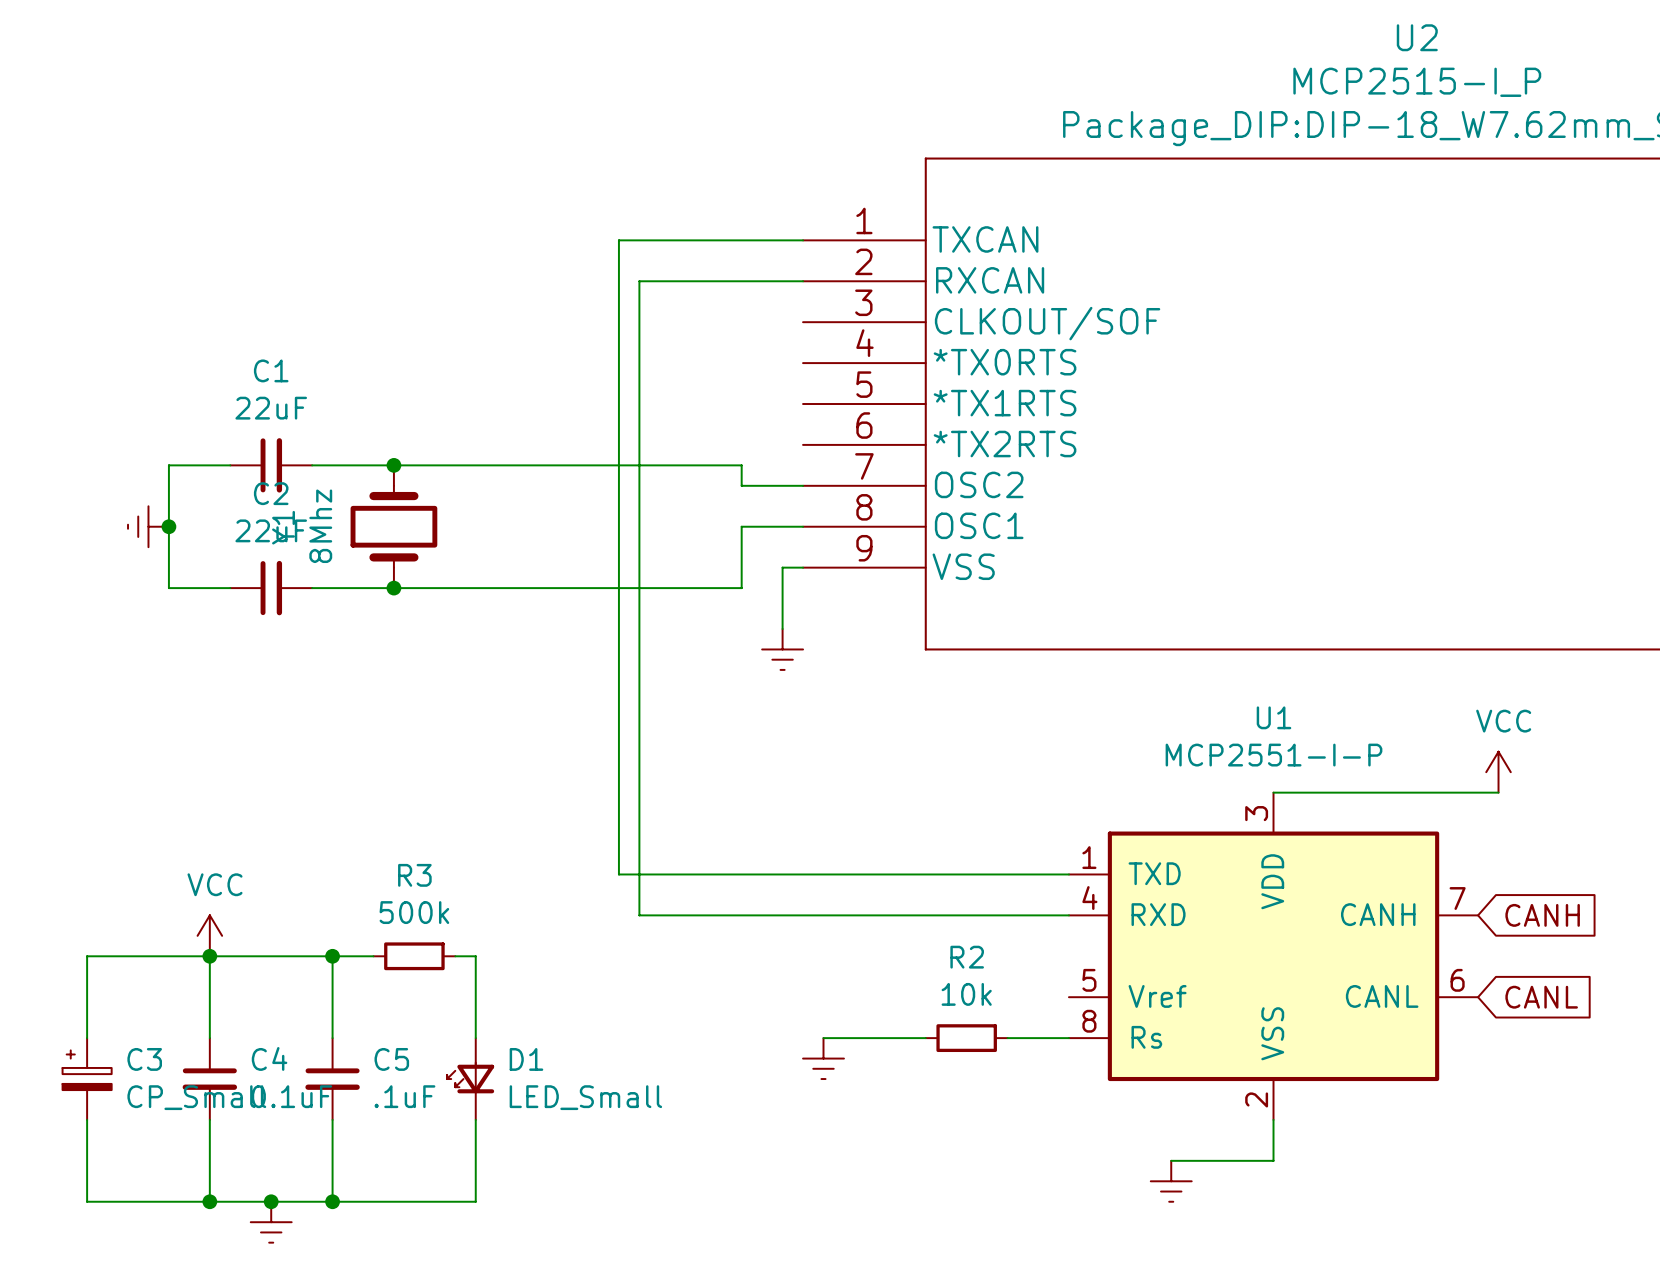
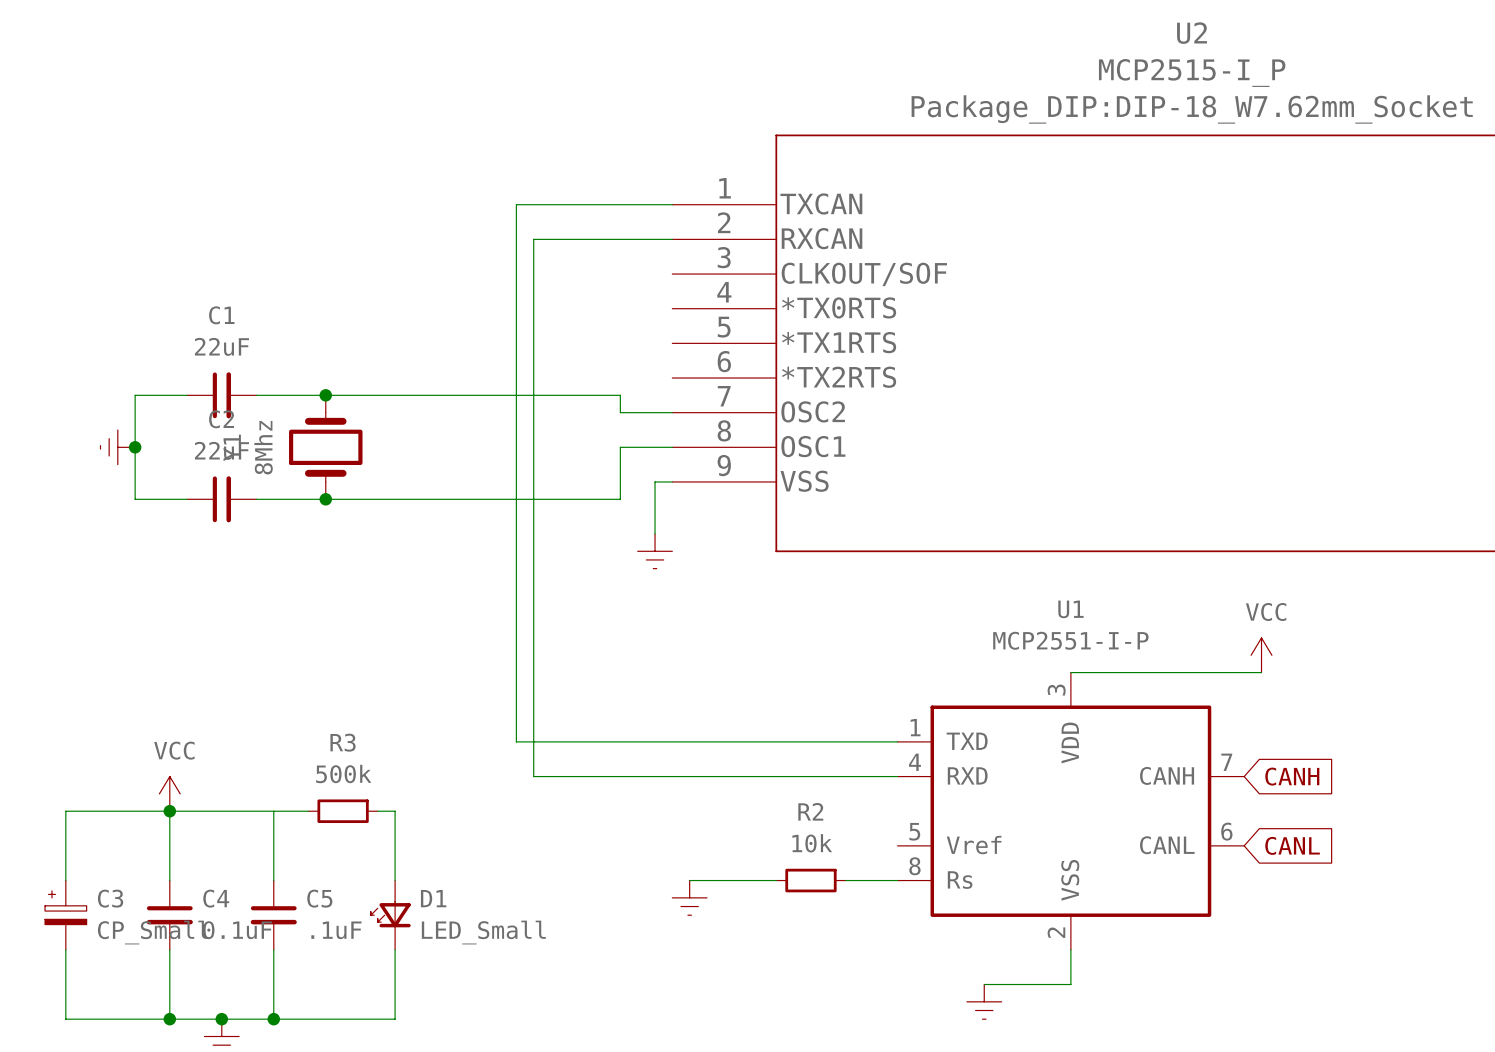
junction: (332, 956) -> none

